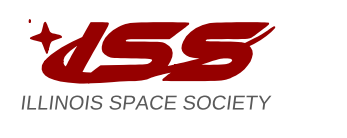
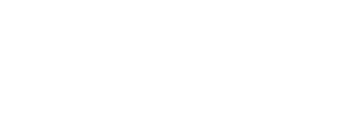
power symbol: (151, 51) -> none
text: ILLINOIS SPACE SOCIETY (146, 102) -> none

